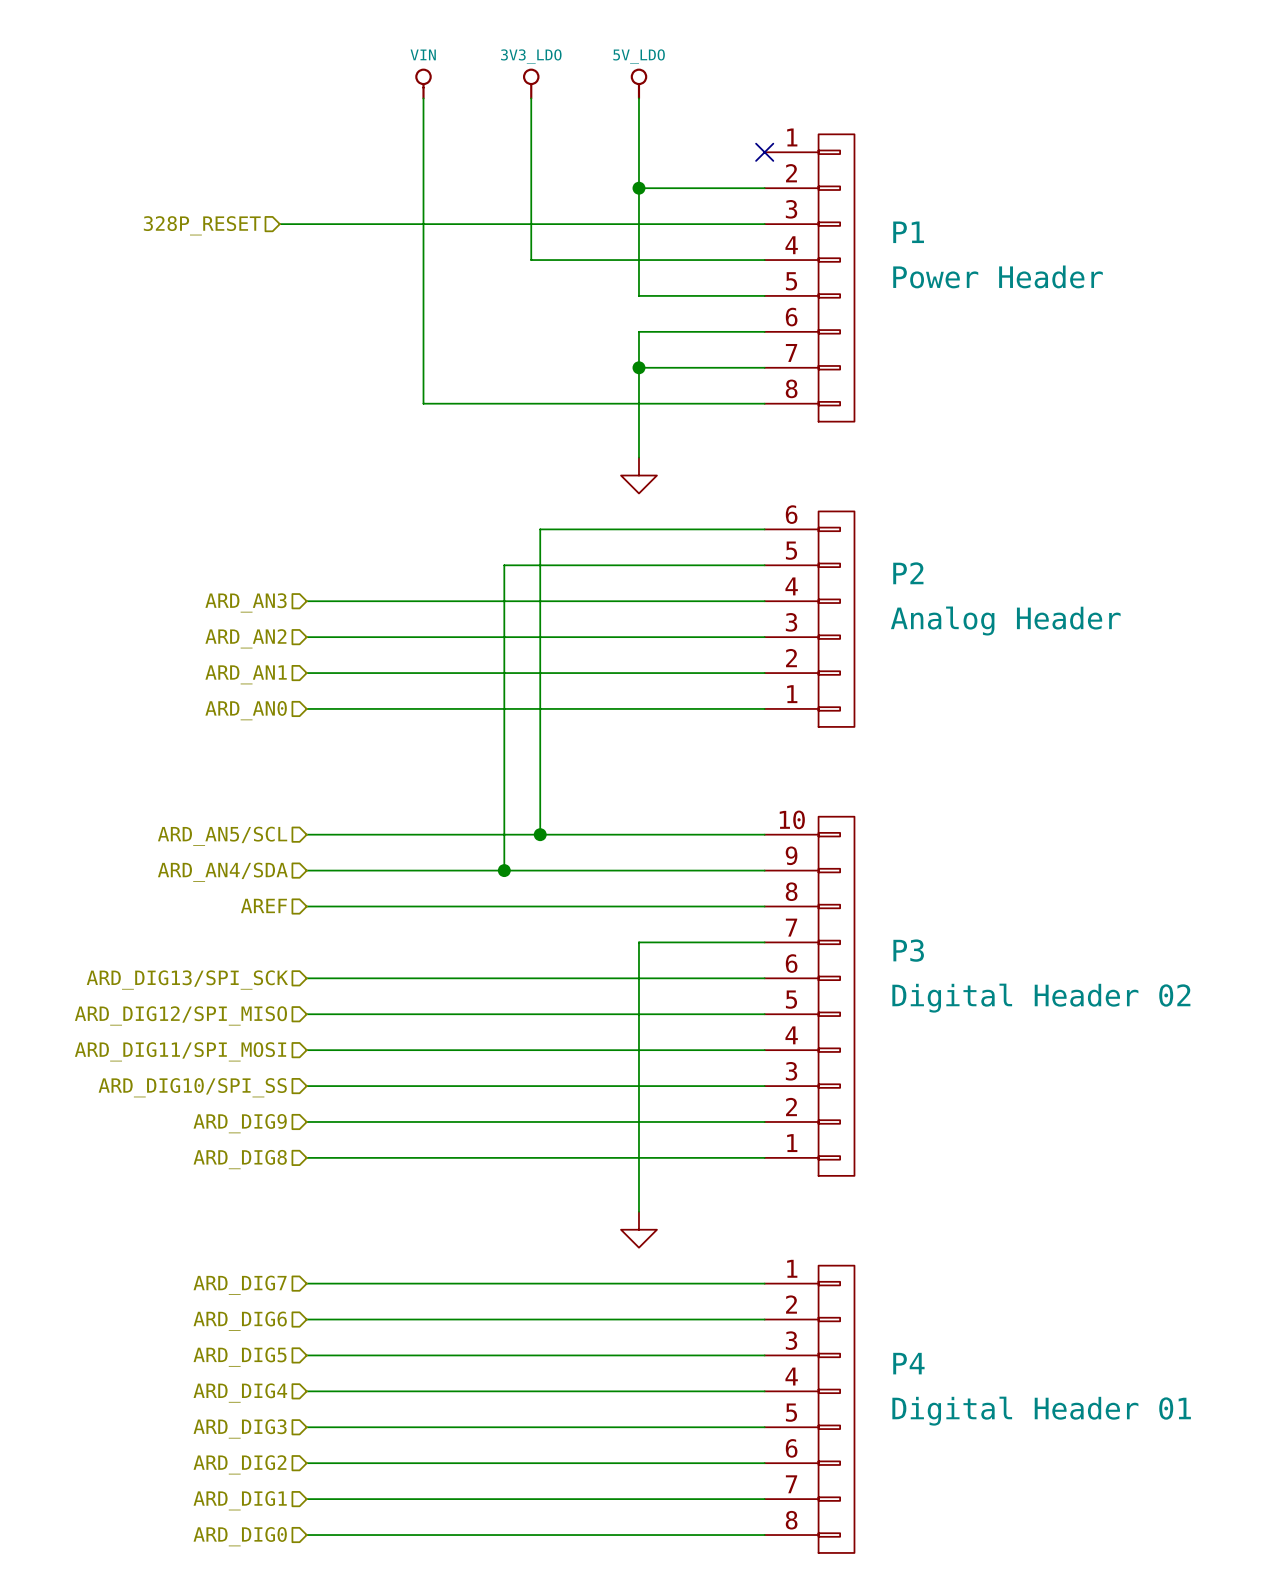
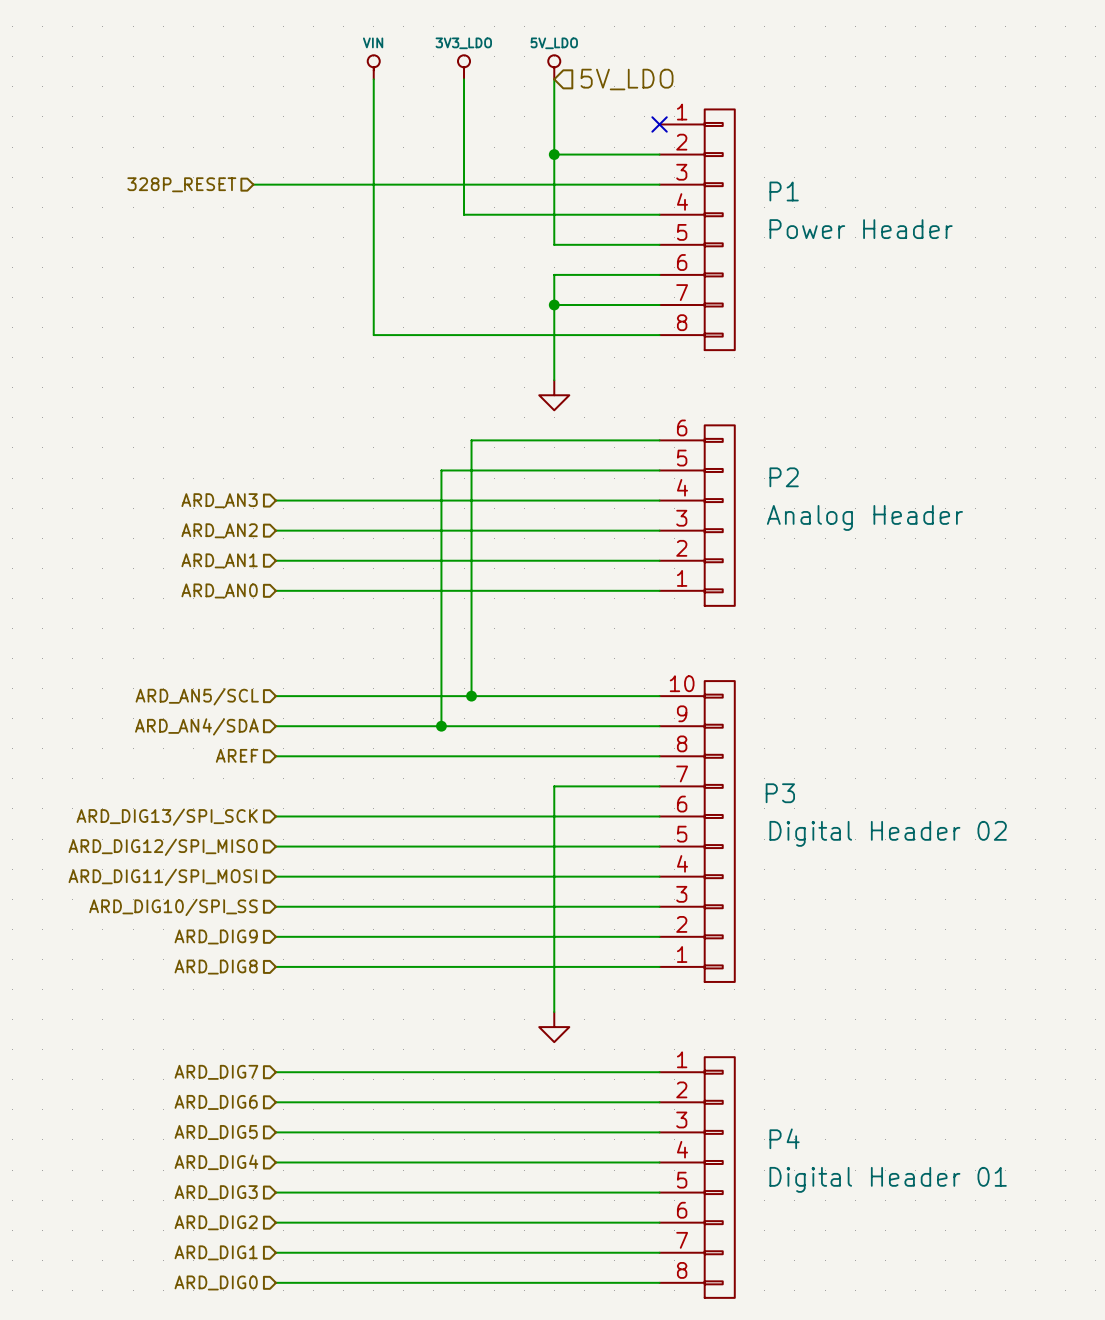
hierarchical label: none -> 5V_LDO (627, 79)

